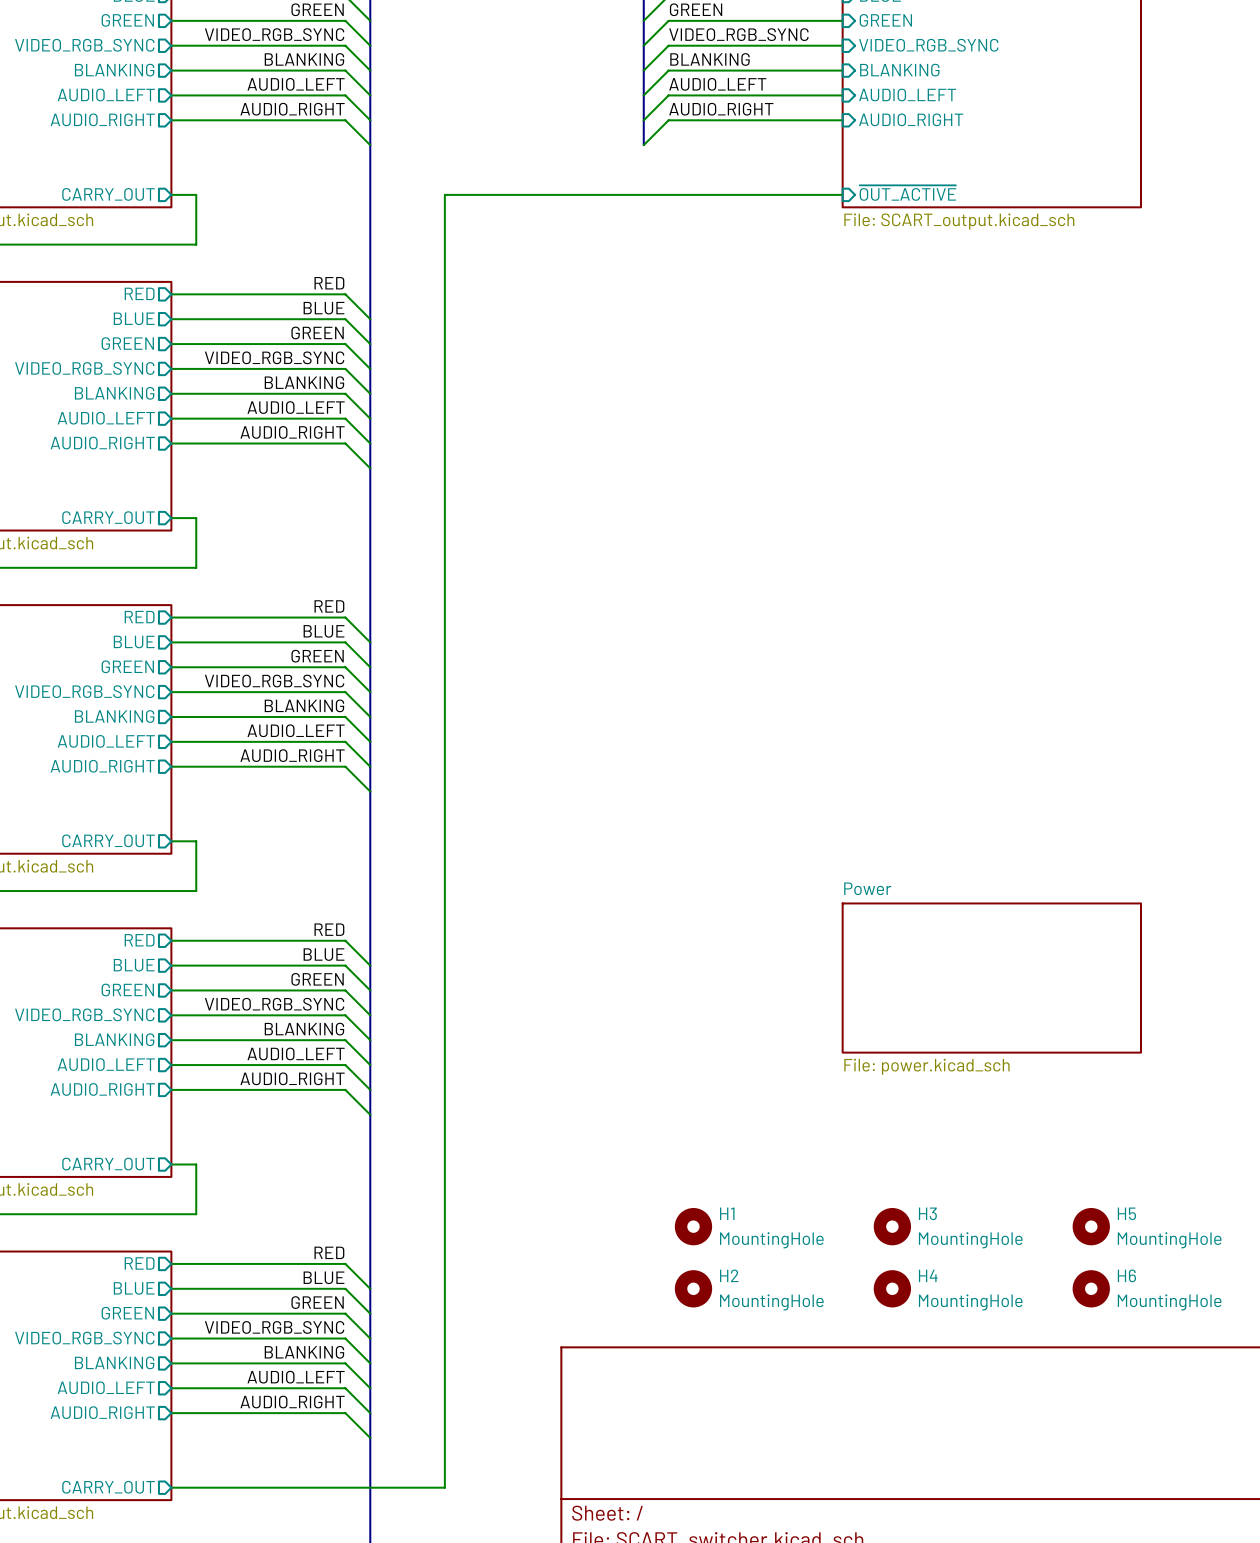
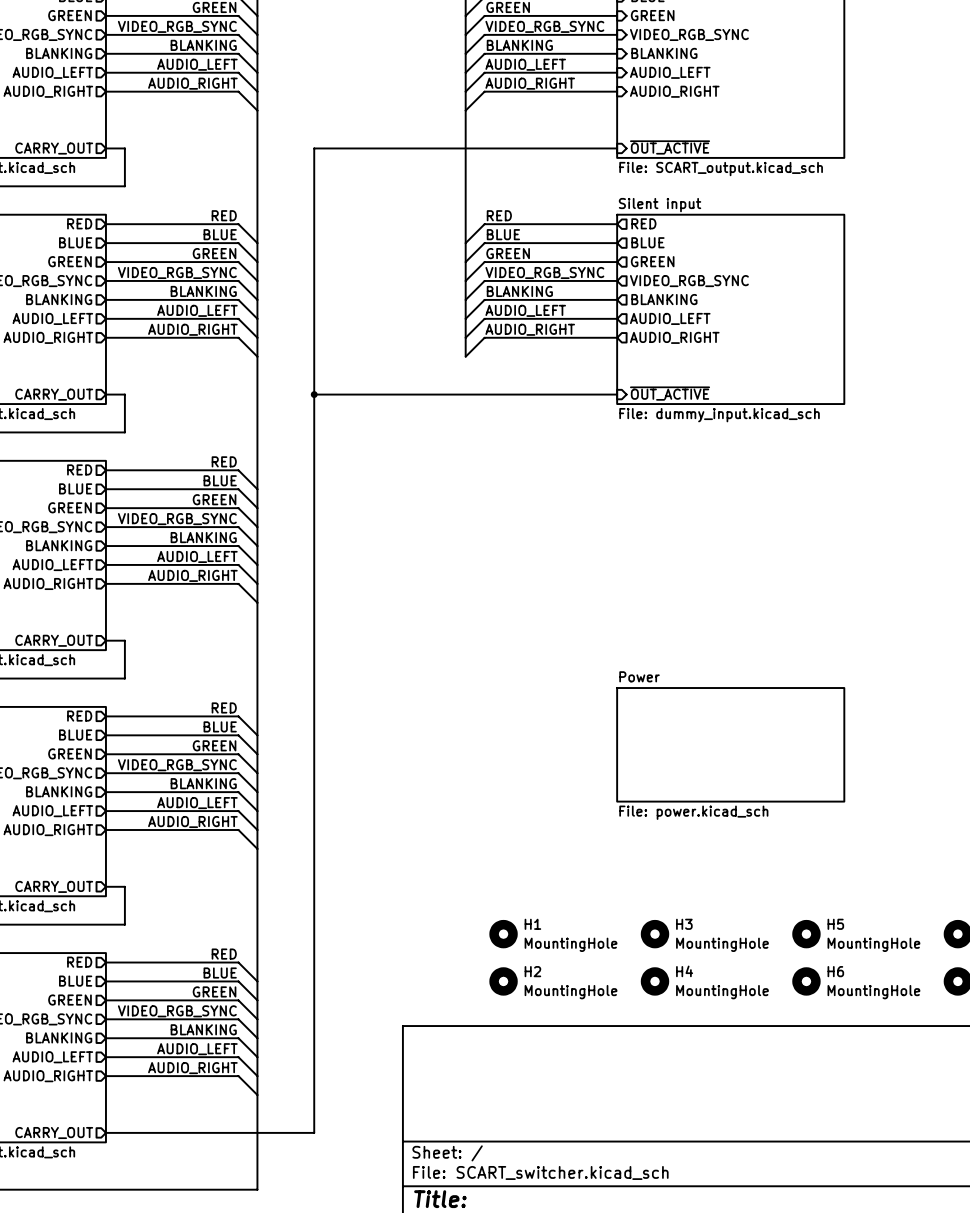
bus: none -> (465, 110) (465, 356)
label: none -> RED (499, 215)
sheet pin: none -> RED (643, 223)
wire: none -> (617, 224) (484, 224) (465, 243)
label: none -> BLUE (503, 234)
sheet pin: none -> BLUE (647, 242)
wire: none -> (617, 243) (484, 243) (465, 262)
label: none -> GREEN (508, 253)
sheet pin: none -> GREEN (652, 261)
wire: none -> (617, 262) (484, 262) (465, 280)
label: none -> VIDEO_RGB_SYNC (544, 272)
wire: none -> (617, 280) (484, 280) (465, 299)
sheet pin: none -> VIDEO_RGB_SYNC (689, 281)
label: none -> BLANKING (519, 291)
wire: none -> (617, 299) (484, 299) (465, 318)
sheet pin: none -> BLANKING (664, 299)
sheet Silent input: none -> File: dummy_input.kicad_sch (730, 309)
label: none -> AUDIO_LEFT (525, 310)
wire: none -> (617, 318) (484, 318) (465, 337)
sheet pin: none -> AUDIO_LEFT (670, 318)
label: none -> AUDIO_RIGHT (530, 329)
wire: none -> (617, 337) (484, 337) (465, 356)
sheet pin: none -> AUDIO_RIGHT (674, 337)
sheet pin: none -> ~{OUT_ACTIVE} (670, 393)
wire: none -> (314, 394) (617, 394)
junction: none -> (314, 394)

